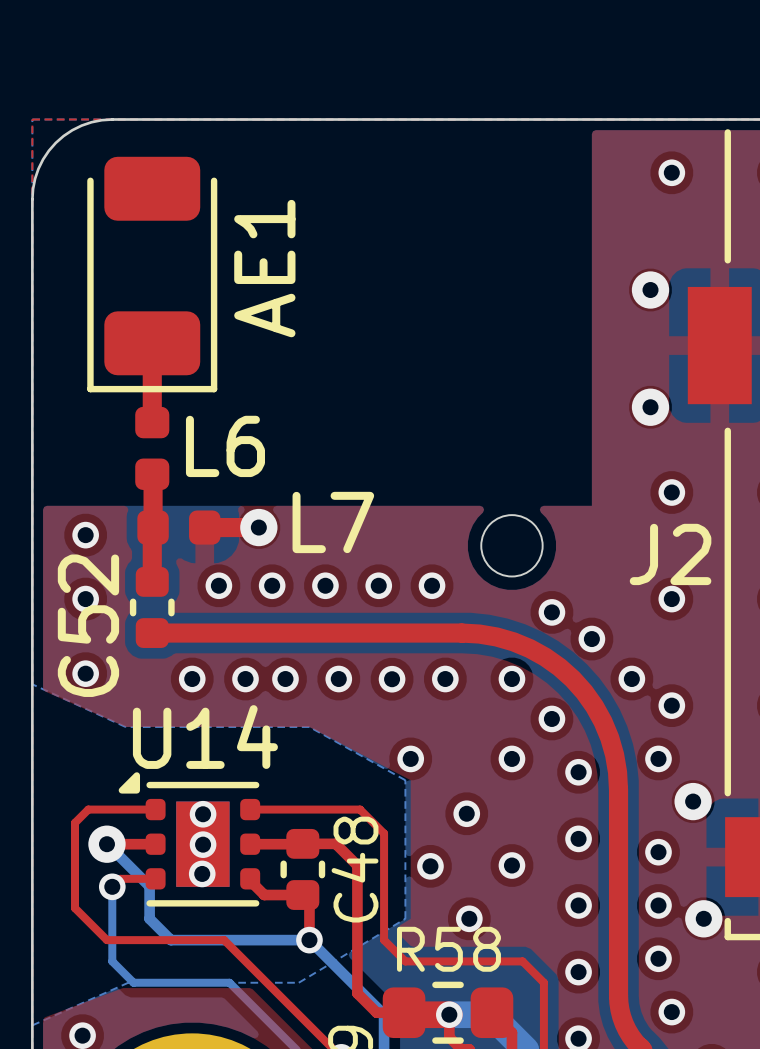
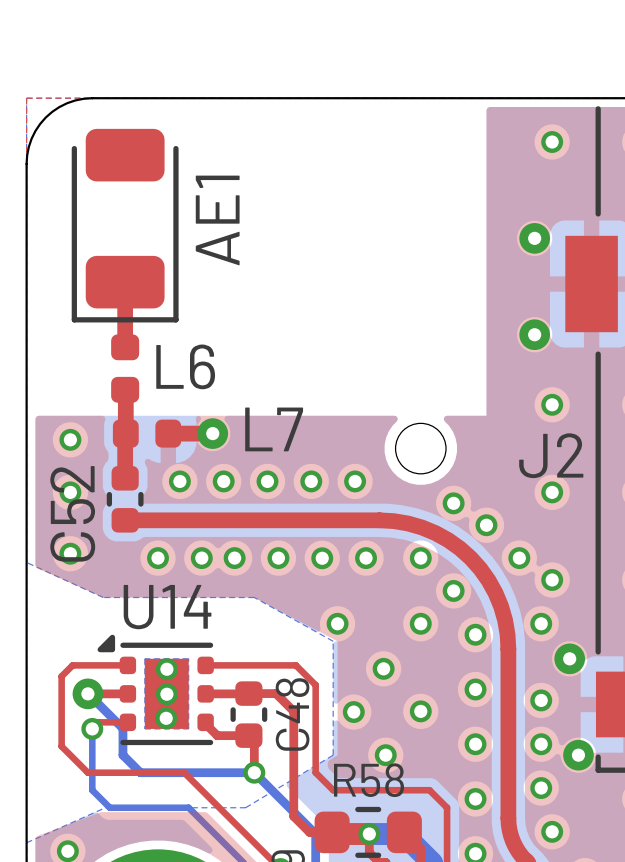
U14 footprint: [118, 772, 261, 907] -> [97, 634, 214, 746]
bottom zone outline: none -> (144, 658) (144, 728) (188, 728) (188, 658) (144, 658)

